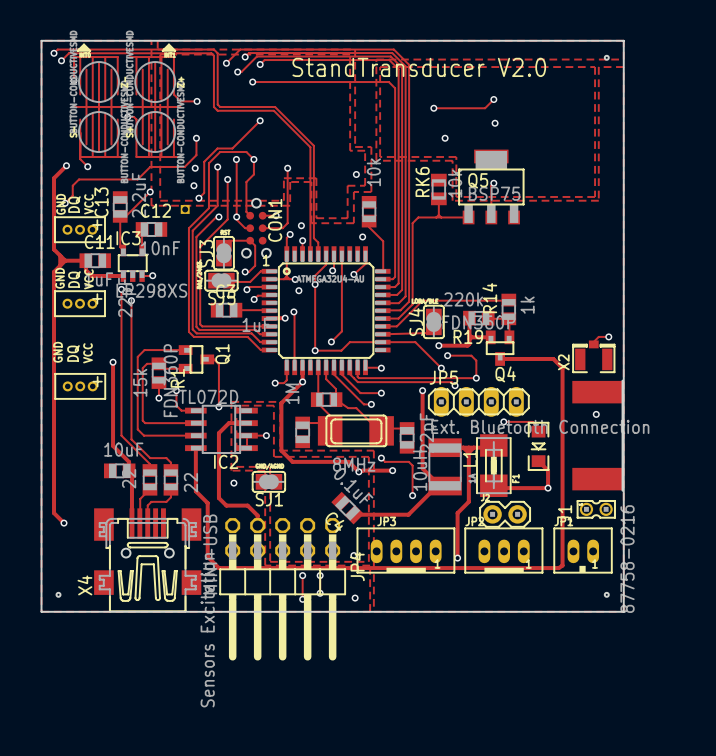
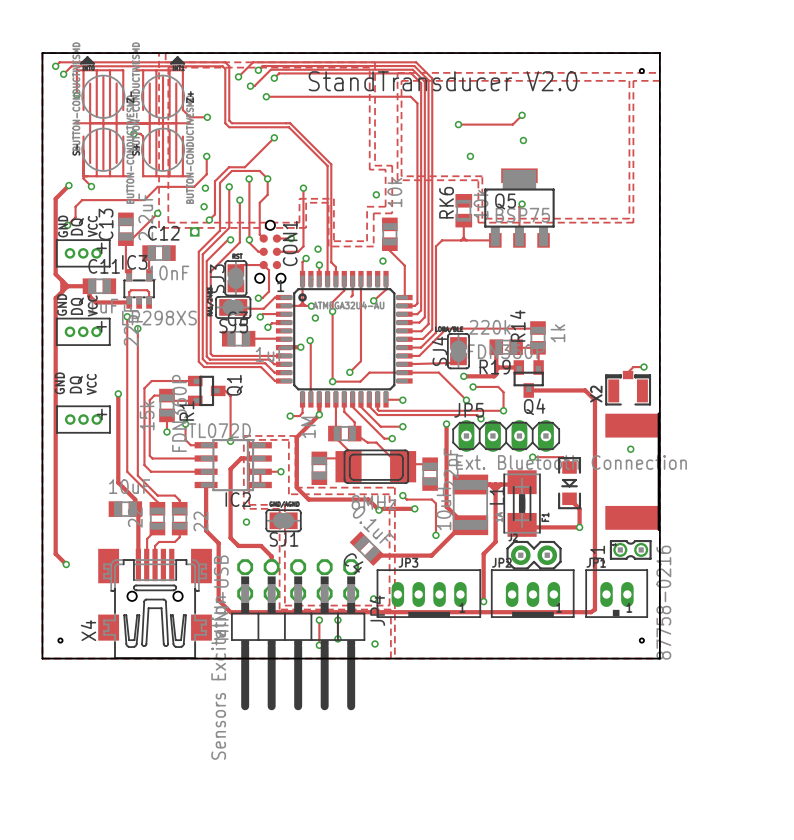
via: (332, 270) -> none
track: (152, 275) (142, 275) -> (129, 302) (129, 292) (131, 290) (147, 290) (149, 292) (149, 302)
via: (152, 275) -> none

